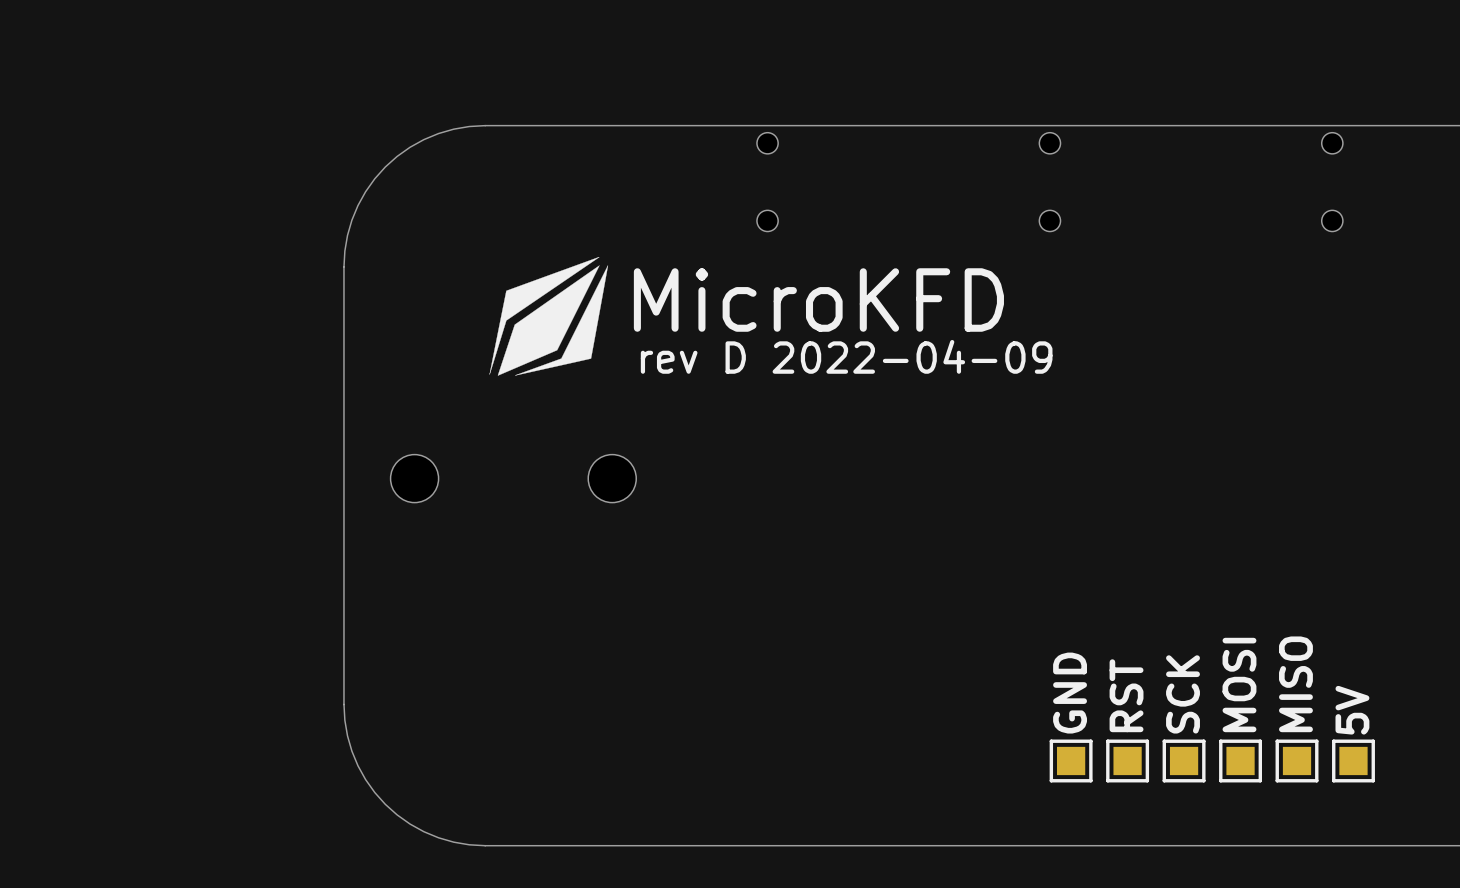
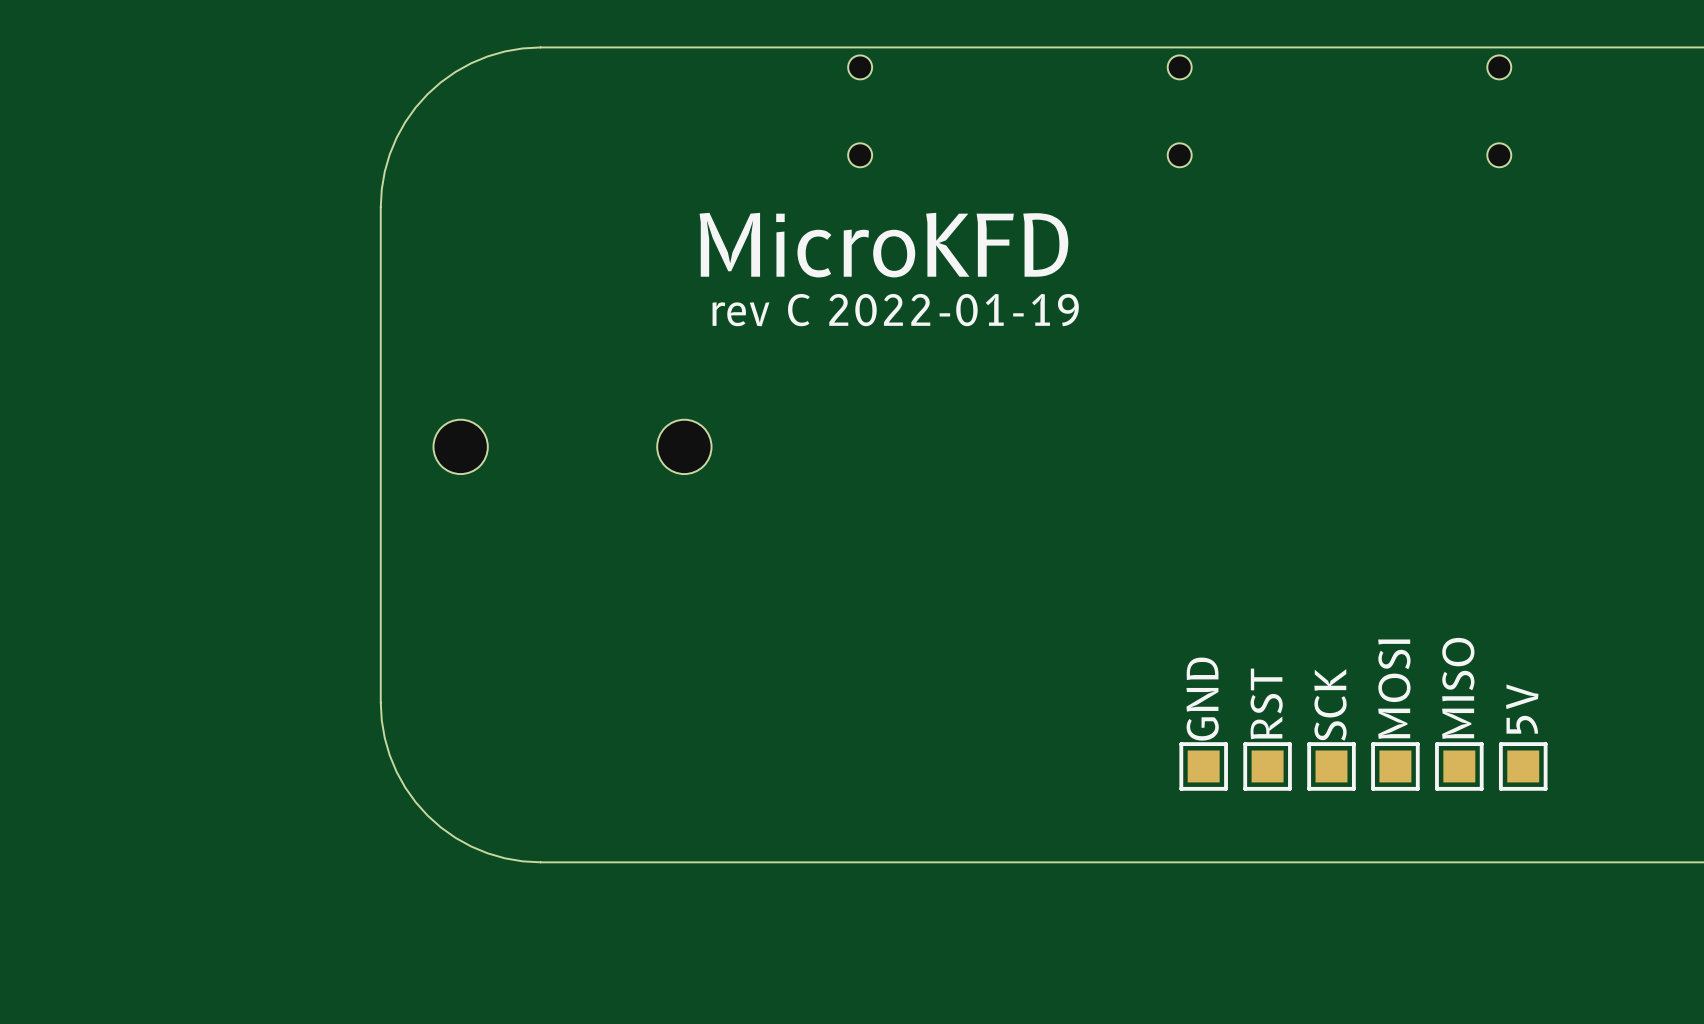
drawing: [489, 257, 609, 376] -> none
text: rev D 2022-04-09 (846, 356) -> rev C 2022-01-19 (895, 310)

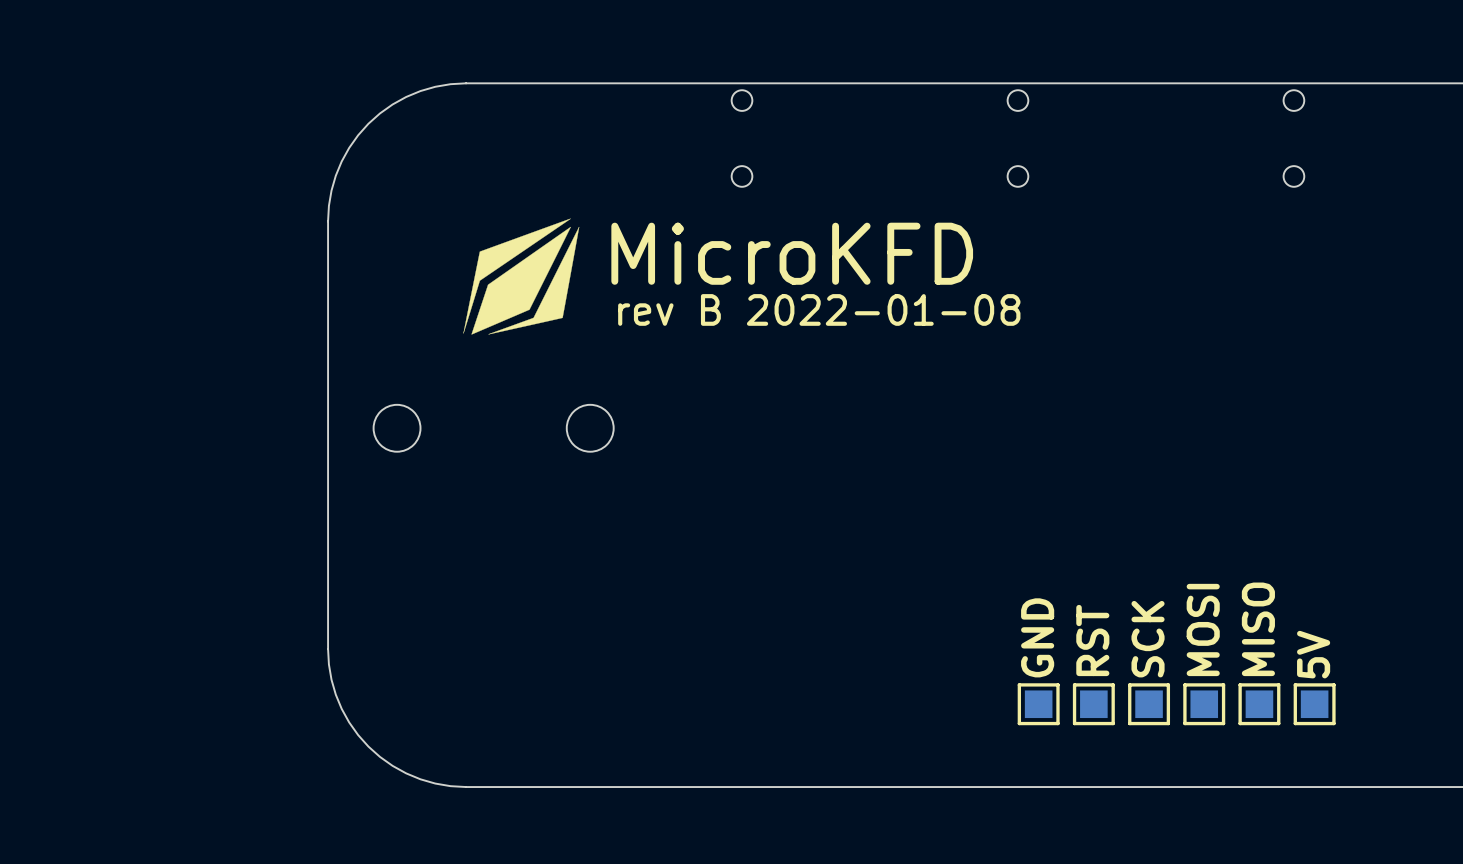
drawing: none -> [463, 218, 580, 335]
text: rev C 2022-01-19 (895, 310) -> rev B 2022-01-08 (819, 309)

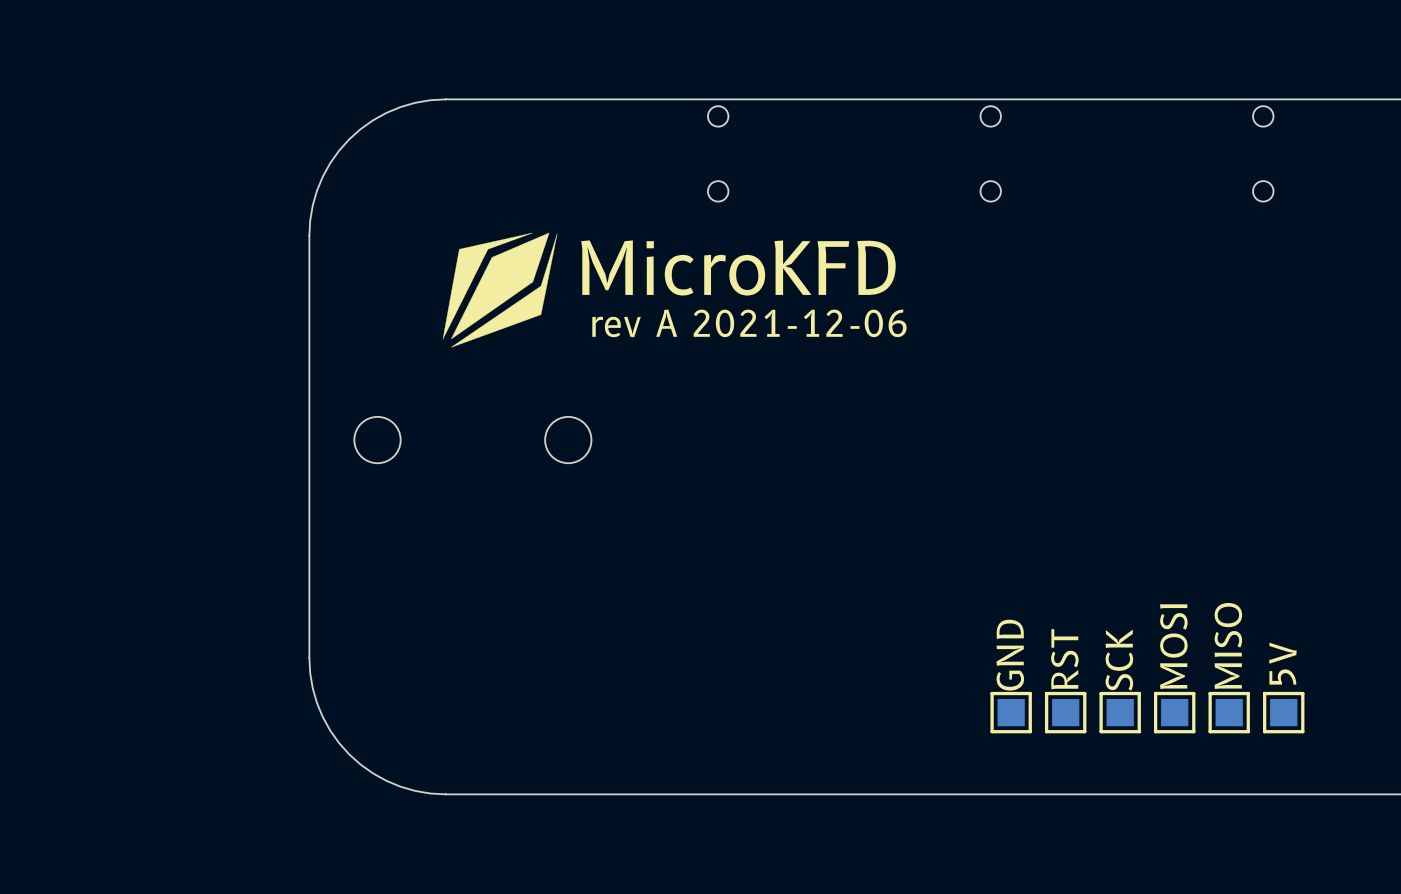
drawing shape: [463, 218, 580, 335] -> [442, 232, 558, 348]
text: rev B 2022-01-08 (819, 309) -> rev A 2021-12-06 (749, 323)

